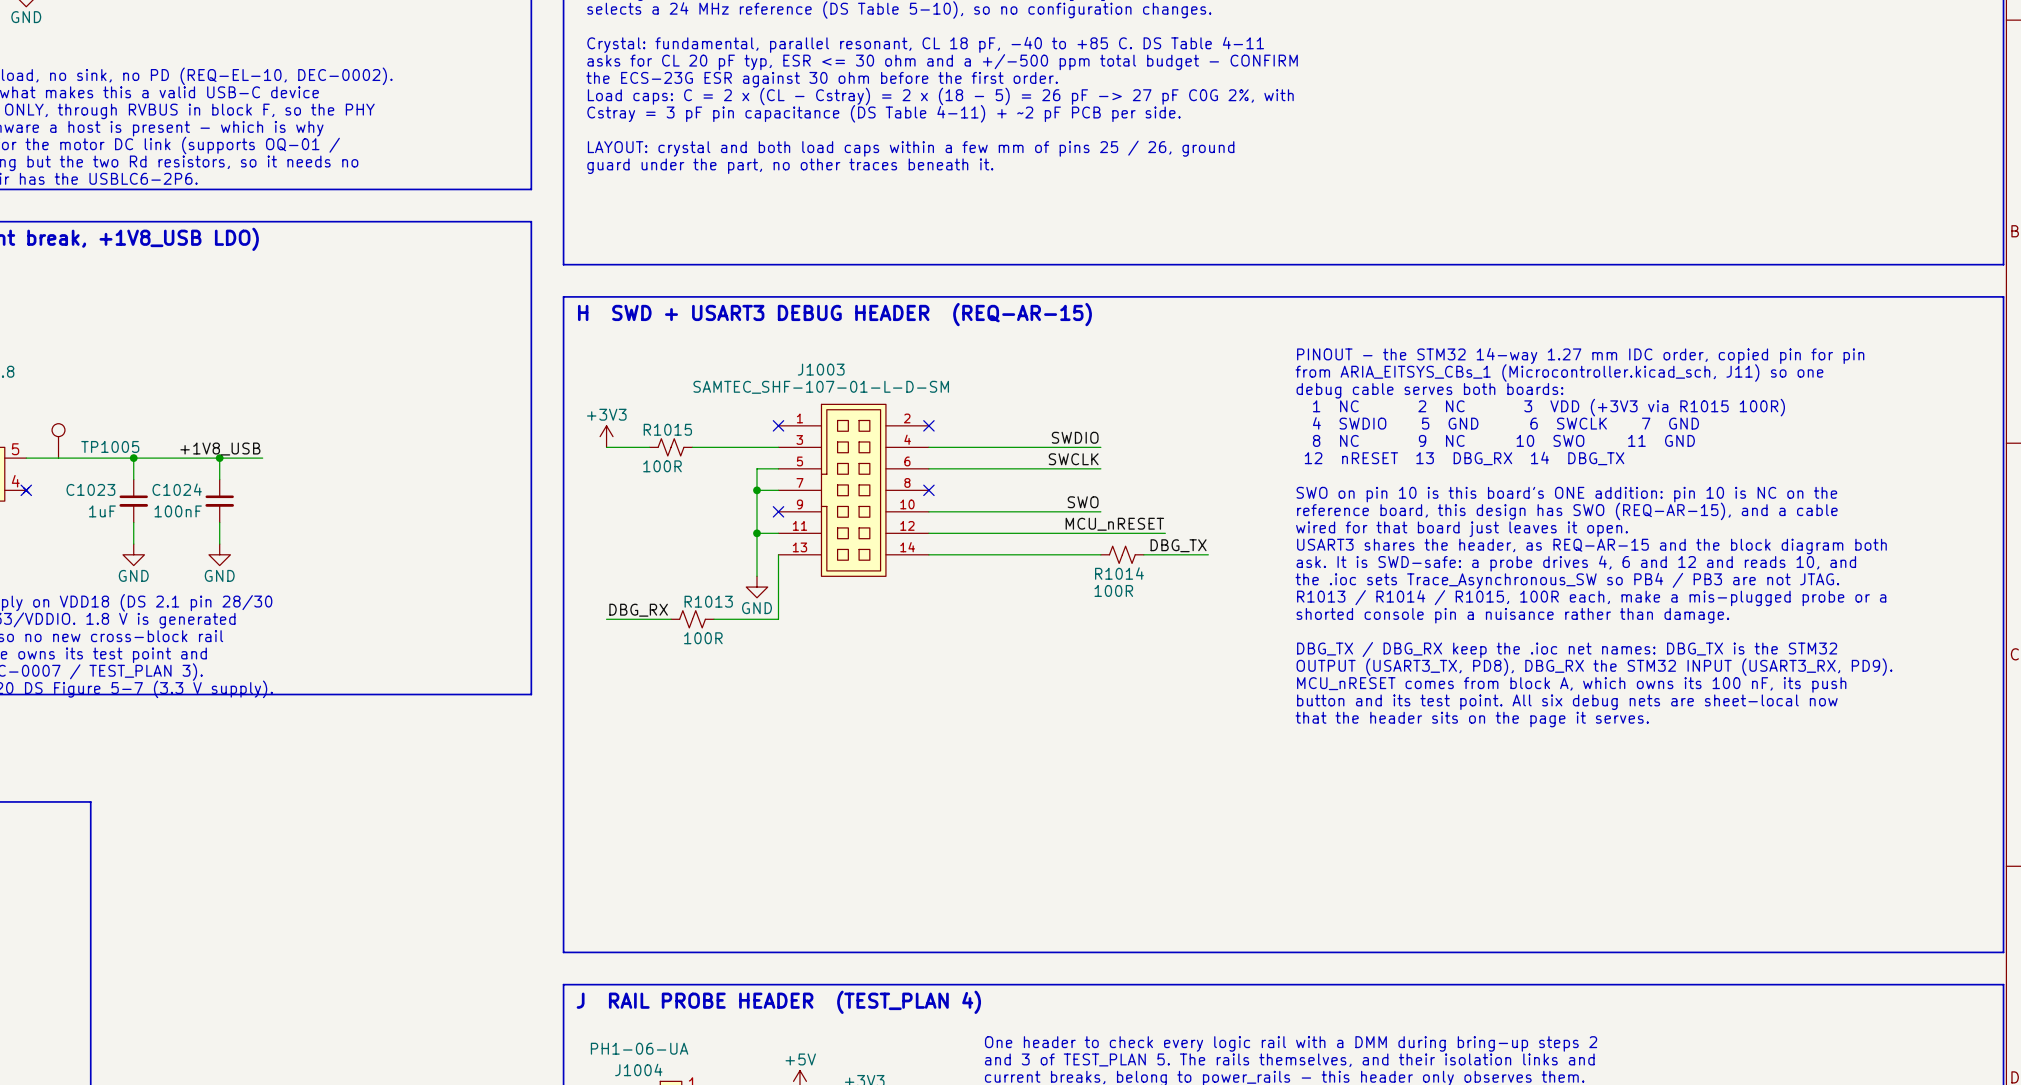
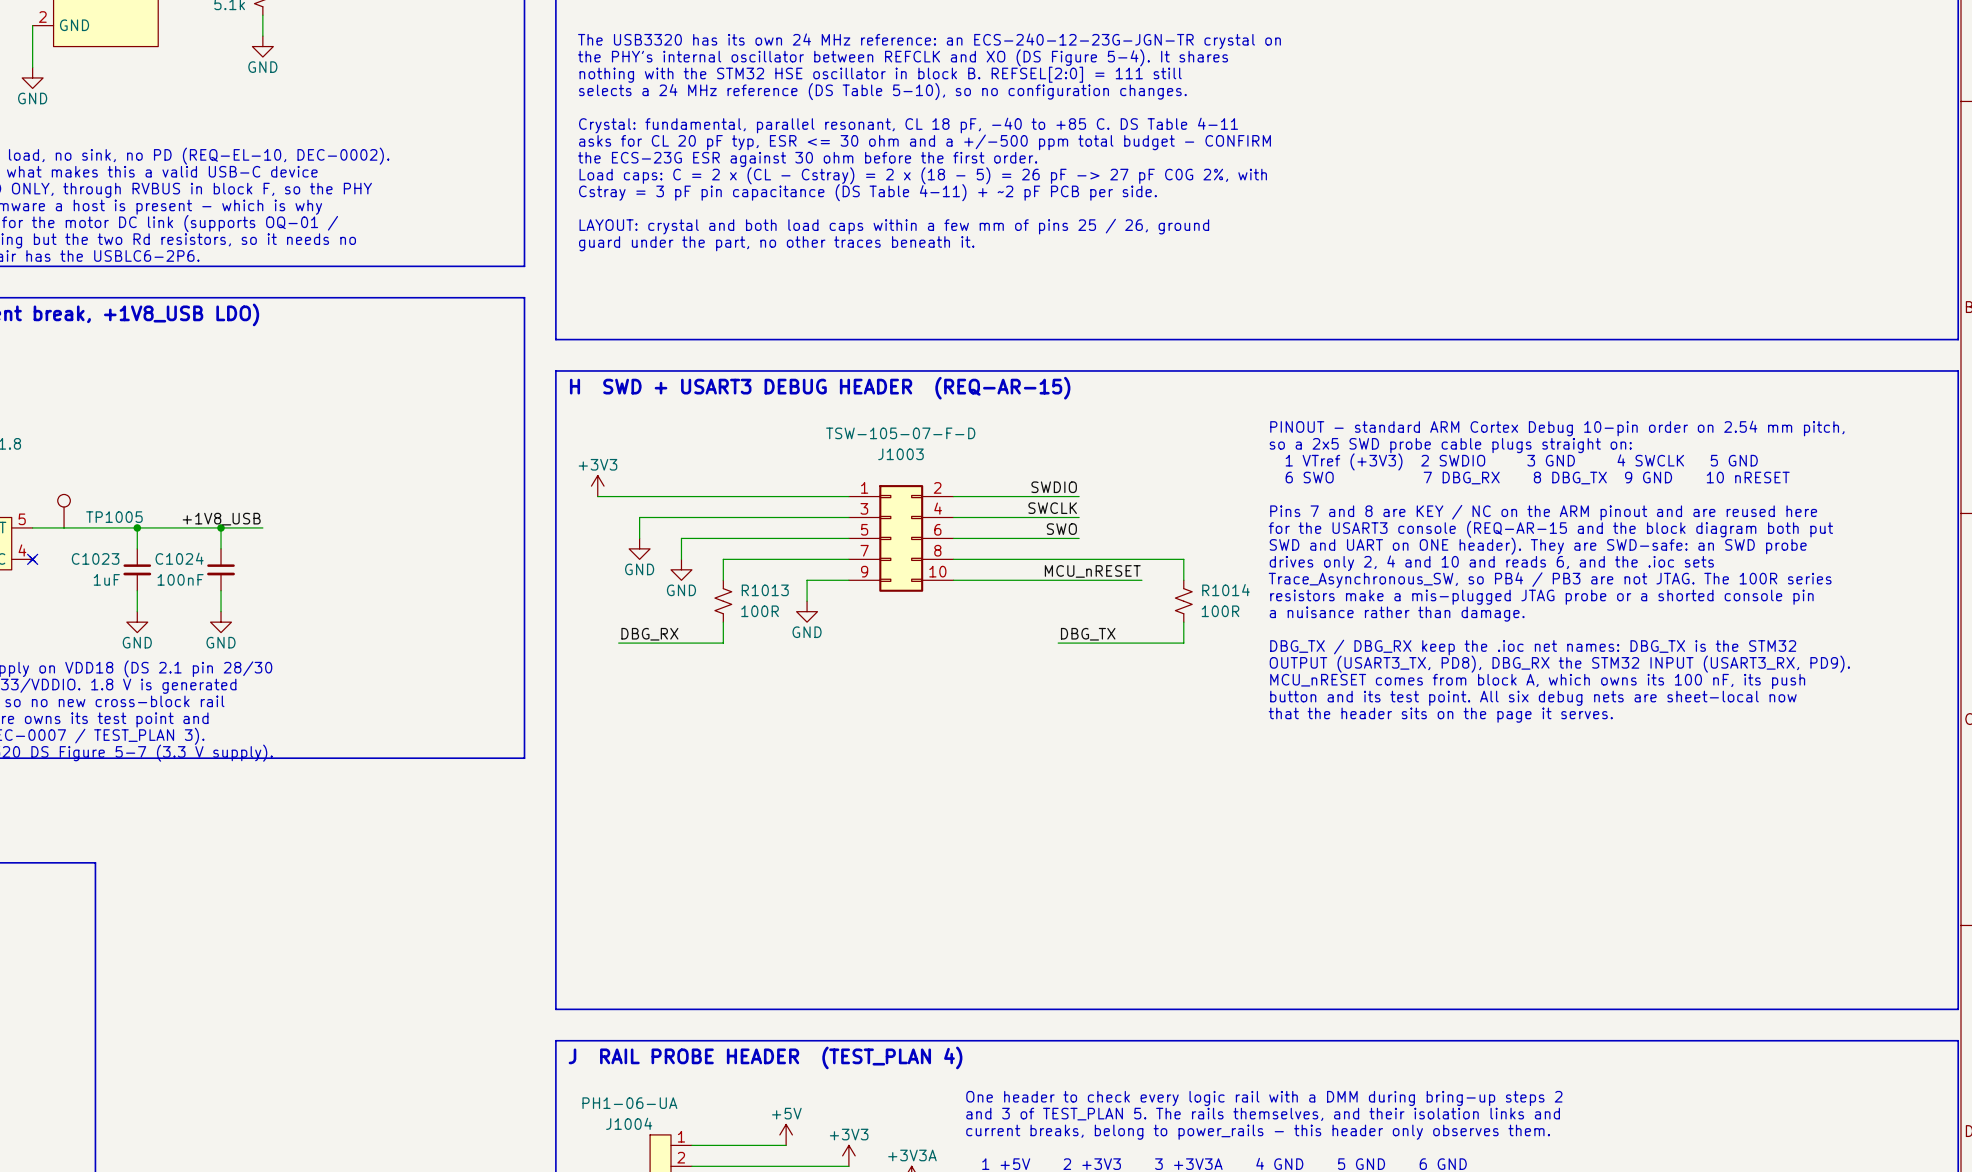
text: PINOUT - the STM32 14-way 1.27 mm IDC order, copied pin for pin (1580, 355) -> PINOUT - standard ARM Cortex Debug 10-pin order on 2.54 mm pitch, (1557, 428)
J1003 name position: J1003 (821, 369) -> J1003 (900, 454)
text: from ARIA_EITSYS_CBs_1 (Microcontroller.kicad_sch, J11) so one (1559, 372) -> so a 2x5 SWD probe cable plugs straight on: (1450, 445)
J1003 value: SAMTEC_SHF-107-01-L-D-SM (821, 387) -> TSW-105-07-F-D (900, 433)
text: debug cable serves both boards: (1429, 390) -> 1 VTref (+3V3) 2 SWDIO 3 GND 4 SWCLK 5 GND (1521, 461)
J1003 symbol: [778, 404, 929, 577] -> [848, 485, 954, 592]
text: 1 NC 2 NC 3 VDD (+3V3 via R1015 100R) (1548, 407) -> 6 SWO 7 DBG_RX 8 DBG_TX 9 GND 10 nRESET (1537, 478)
label: none -> SWDIO (1054, 487)
text: 4 SWDIO 5 GND 6 SWCLK 7 GND (1505, 423) -> none
wire: none -> (597, 496) (848, 496)
no-connect mark: (778, 425) -> none
no-connect mark: (928, 425) -> none
wire: none -> (953, 496) (1079, 496)
power symbol position: +3V3 (606, 436) -> +3V3 (597, 486)
label: SWDIO (1075, 437) -> SWCLK (1052, 508)
text: 8 NC 9 NC 10 SWO 11 GND (1503, 440) -> Pins 7 and 8 are KEY / NC on the ARM pinout and are reused here (1543, 512)
wire: (606, 447) (649, 447) -> none
R1015: 100R (671, 447) -> none
wire: none -> (681, 517) (639, 517) (639, 538)
text: 12 nRESET 13 DBG_RX 14 DBG_TX (1464, 458) -> for the USART3 console (REQ-AR-15 and the block diagram both put (1550, 529)
label: SWCLK (1073, 459) -> SWO (1061, 529)
wire: (757, 468) (757, 576) -> (744, 538) (681, 538) (681, 559)
text: none -> SWD and UART on ONE header). They are SWD-safe: an SWD probe (1538, 546)
power symbol: none -> GND (639, 548)
wire: none -> (744, 559) (723, 559) (723, 580)
junction: (757, 490) -> none
no-connect mark: (928, 490) -> none
wire: none -> (953, 559) (1183, 559) (1183, 580)
text: SWO on pin 10 is this board's ONE addition: pin 10 is NC on the (1566, 494) -> drives only 2, 4 and 10 and reads 6, and the .ioc sets (1491, 563)
power symbol: none -> GND (681, 569)
label: SWO (1083, 502) -> none
no-connect mark: (778, 511) -> none
wire: none -> (1079, 580) (1141, 580)
text: reference board, this design has SWO (REQ-AR-15), and a cable (1567, 511) -> Trace_Asynchronous_SW, so PB4 / PB3 are not JTAG. The 100R series (1550, 580)
label position: MCU_nRESET (1114, 524) -> MCU_nRESET (1092, 571)
text: wired for that board just leaves it open. (1461, 529) -> resistors make a mis-plugged JTAG probe or a shorted console pin (1541, 597)
wire: (757, 533) (778, 533) -> none
junction: (757, 533) -> none
wire: (928, 533) (1165, 533) -> none
power symbol: none -> GND (807, 611)
label position: DBG_TX (1178, 545) -> DBG_TX (1088, 634)
text: USART3 shares the header, as REQ-AR-15 and the block diagram both (1591, 546) -> a nuisance rather than damage. (1397, 614)
wire: none -> (723, 622) (723, 643) (618, 643)
wire: (778, 554) (778, 619) (714, 619) -> none
wire: (928, 554) (1100, 554) -> none
R1014 rotation: 0° (1122, 554) -> 90° clockwise (1183, 601)
R1014 position: (1122, 554) -> (1183, 601)
wire: (1143, 554) (1208, 554) -> (1058, 643) (1183, 643) (1183, 622)
text: ask. It is SWD-safe: a probe drives 4, 6 and 12 and reads 10, and (1576, 563) -> none
R1014 name position: R1014 (1119, 573) -> R1014 (1225, 590)
text: the .ioc sets Trace_Asynchronous_SW so PB4 / PB3 are not JTAG. (1567, 580) -> DBG_TX / DBG_RX keep the .ioc net names: DBG_TX is the STM32 (1533, 647)
power symbol: GND (757, 587) -> none
R1014 value position: 100R (1113, 590) -> 100R (1220, 611)
text: R1013 / R1014 / R1015, 100R each, make a mis-plugged probe or a (1591, 598) -> OUTPUT (USART3_TX, PD8), DBG_RX the STM32 INPUT (USART3_RX, PD9). (1559, 664)
R1013 name position: R1013 (708, 601) -> R1013 (765, 590)
label position: DBG_RX (638, 610) -> DBG_RX (649, 634)
text: shorted console pin a nuisance rather than damage. (1512, 615) -> MCU_nRESET comes from block A, which owns its 100 nF, its push (1537, 681)
wire: (606, 619) (671, 619) -> none
R1013 rotation: 0° (692, 619) -> 90° clockwise (723, 601)
R1013 position: (692, 619) -> (723, 601)
R1013 value position: 100R (703, 638) -> 100R (760, 611)
text: DBG_TX / DBG_RX keep the .ioc net names: DBG_TX is the STM32 (1567, 650) -> that the header sits on the page it serves. (1440, 715)
text: OUTPUT (USART3_TX, PD8), DBG_RX the STM32 INPUT (USART3_RX, PD9). (1594, 667) -> none
text: MCU_nRESET comes from block A, which owns its 100 nF, its push (1571, 684) -> none
text position: button and its test point. All six debug nets are sheet-local now (1567, 702) -> button and its test point. All six debug nets are sheet-local now (1533, 698)
text: that the header sits on the page it serves. (1472, 719) -> none

